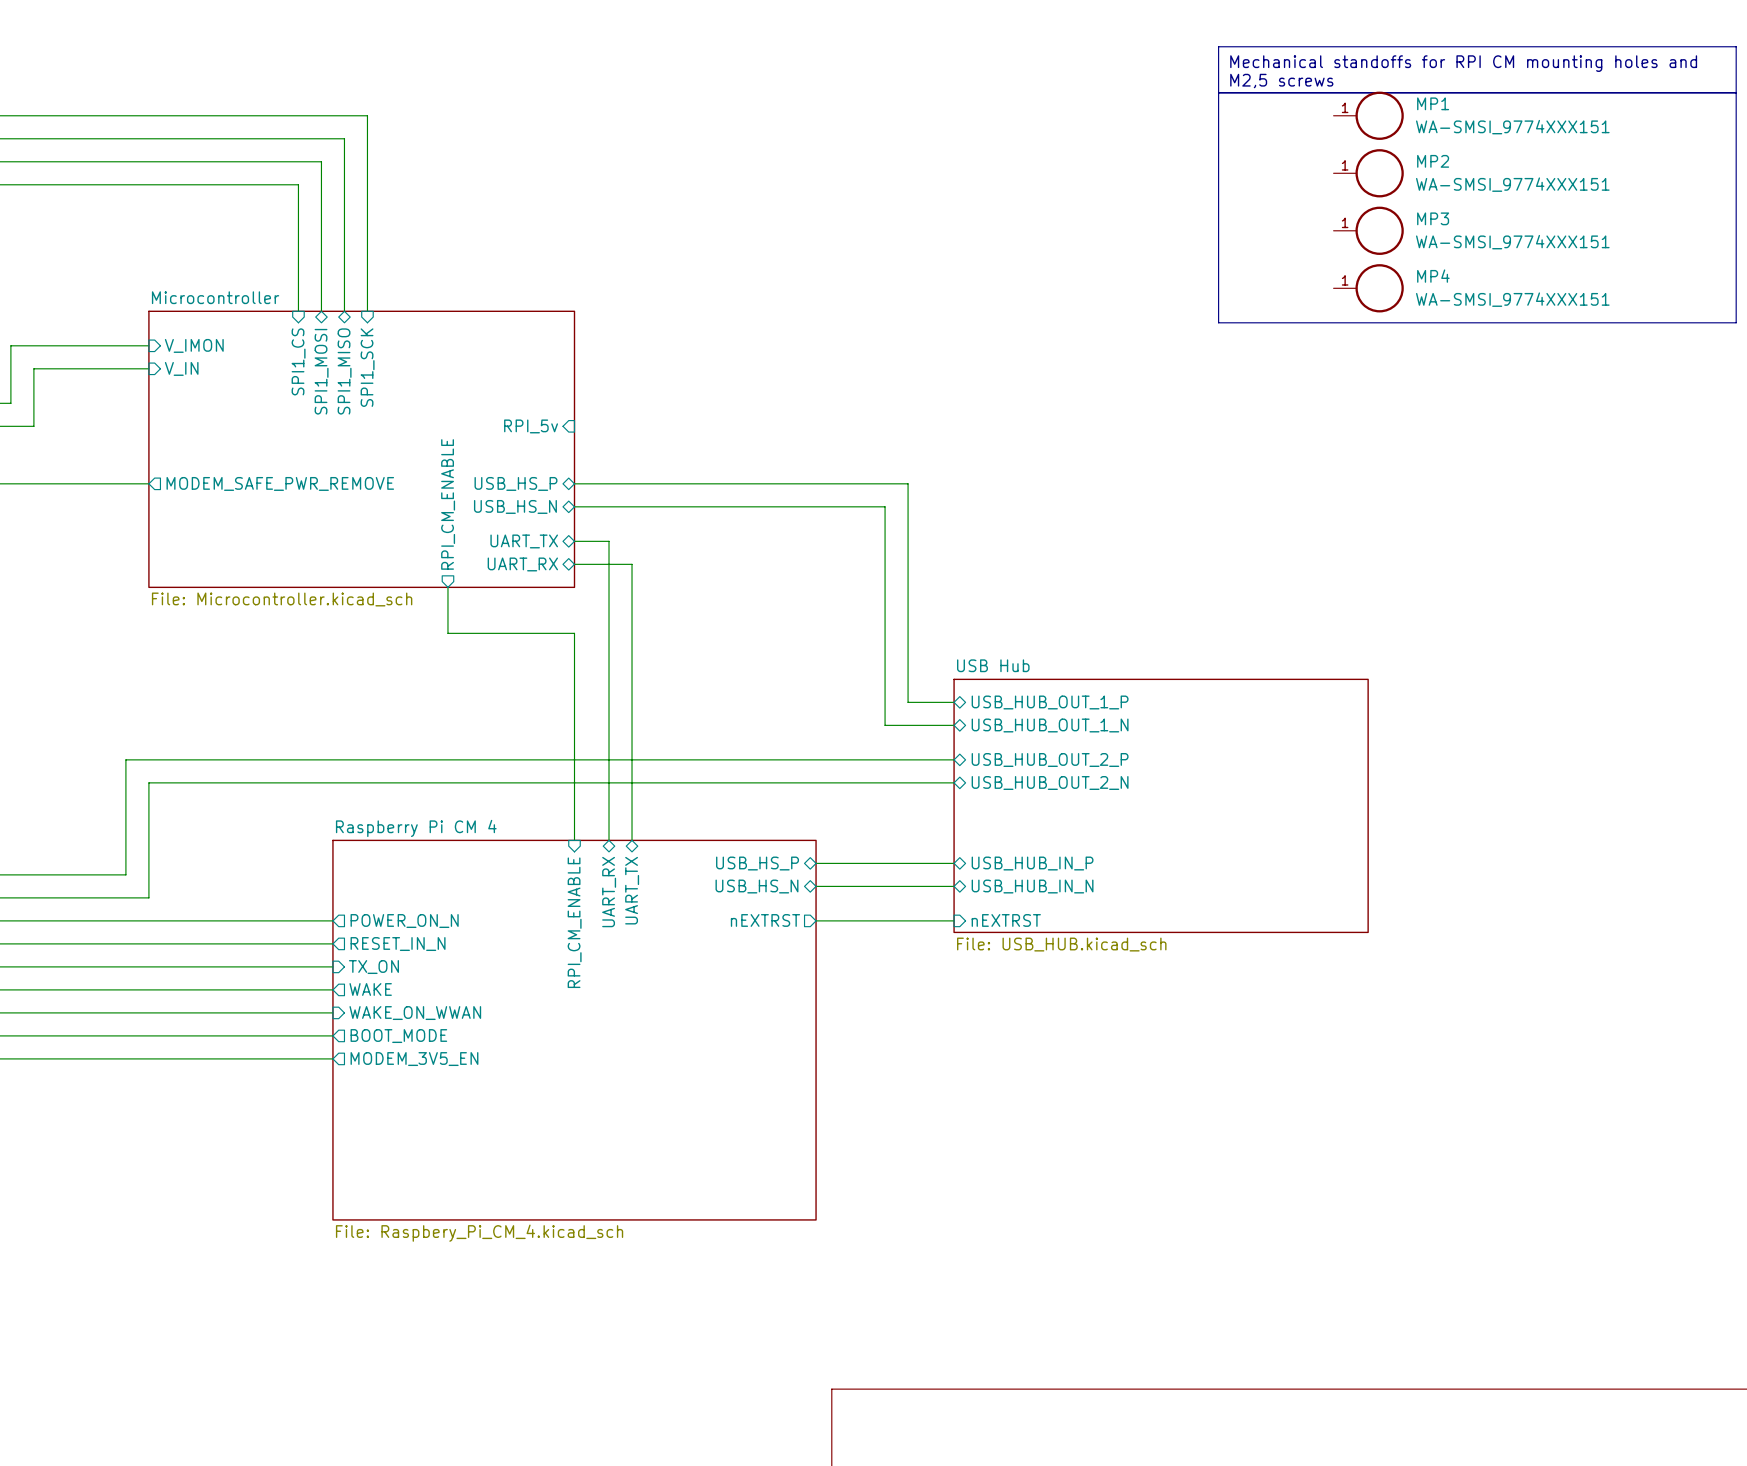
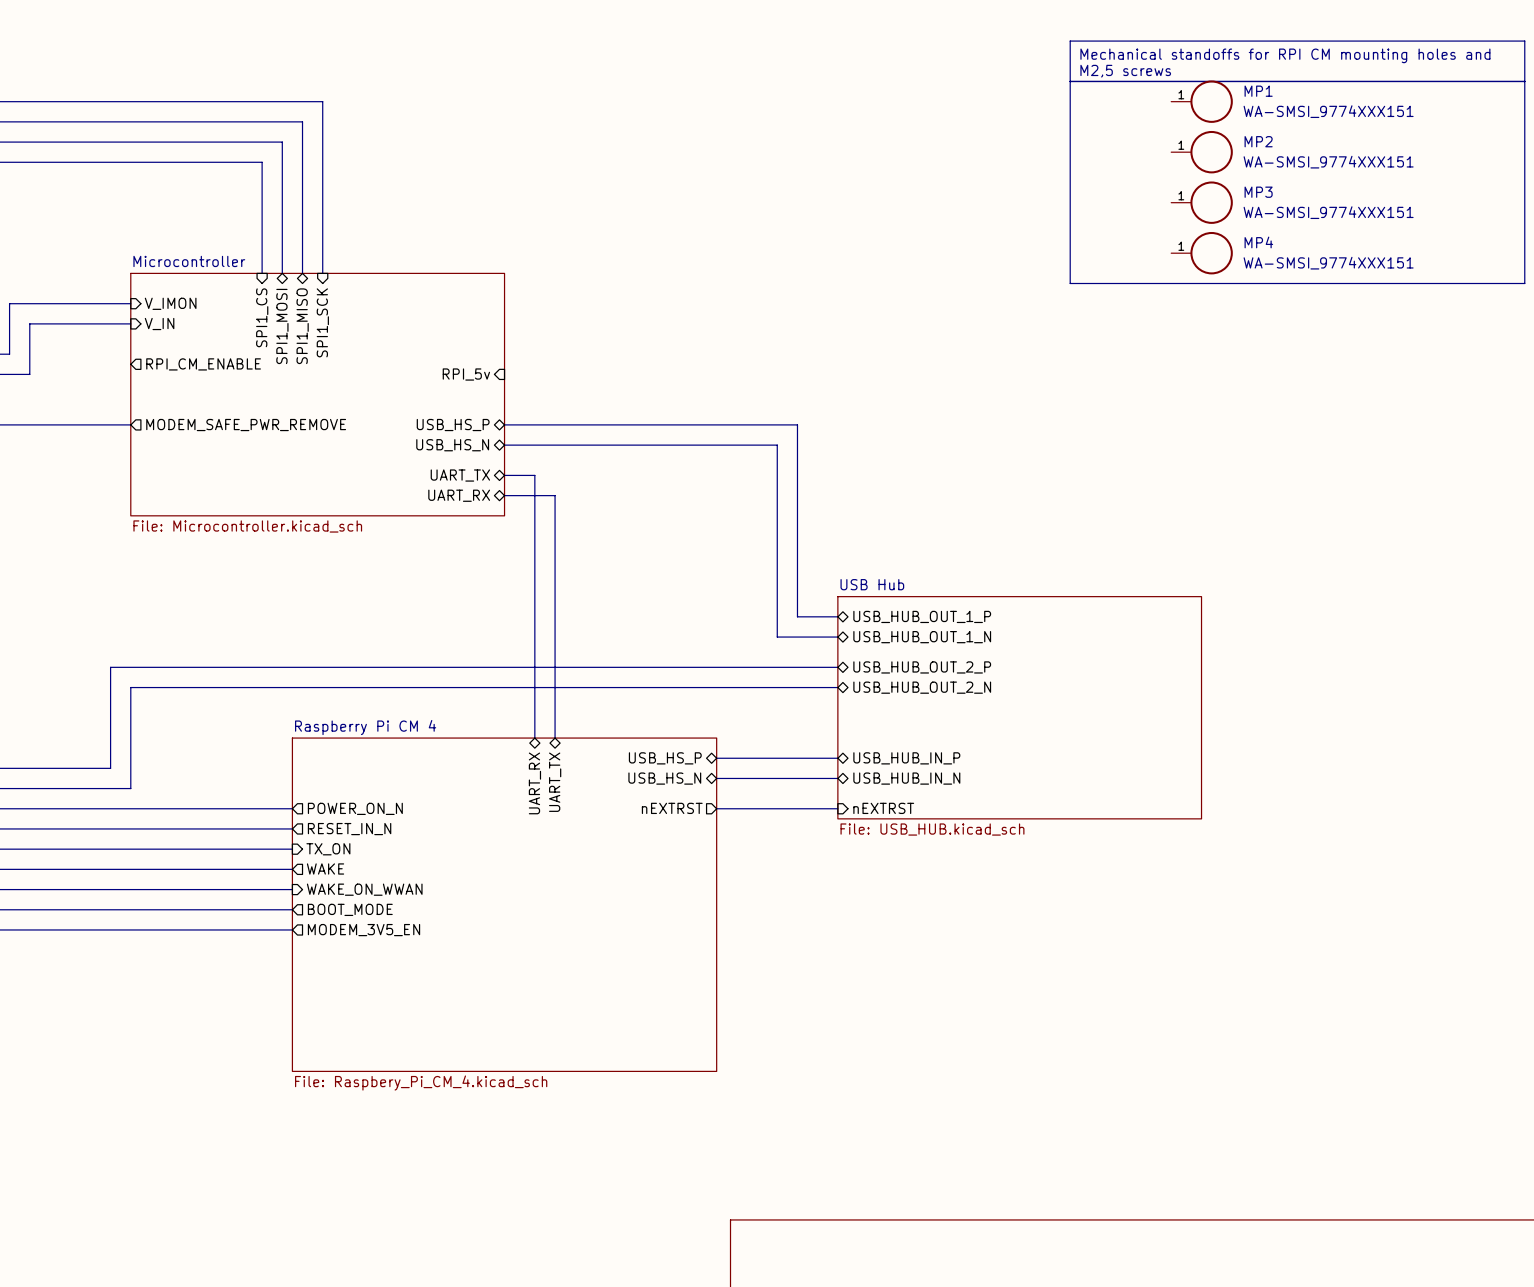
sheet pin: none -> RPI_CM_ENABLE (203, 364)
sheet pin: RPI_CM_ENABLE (448, 504) -> none
wire: (447, 587) (447, 633) (574, 633) (574, 840) -> none
sheet pin: RPI_CM_ENABLE (574, 922) -> none

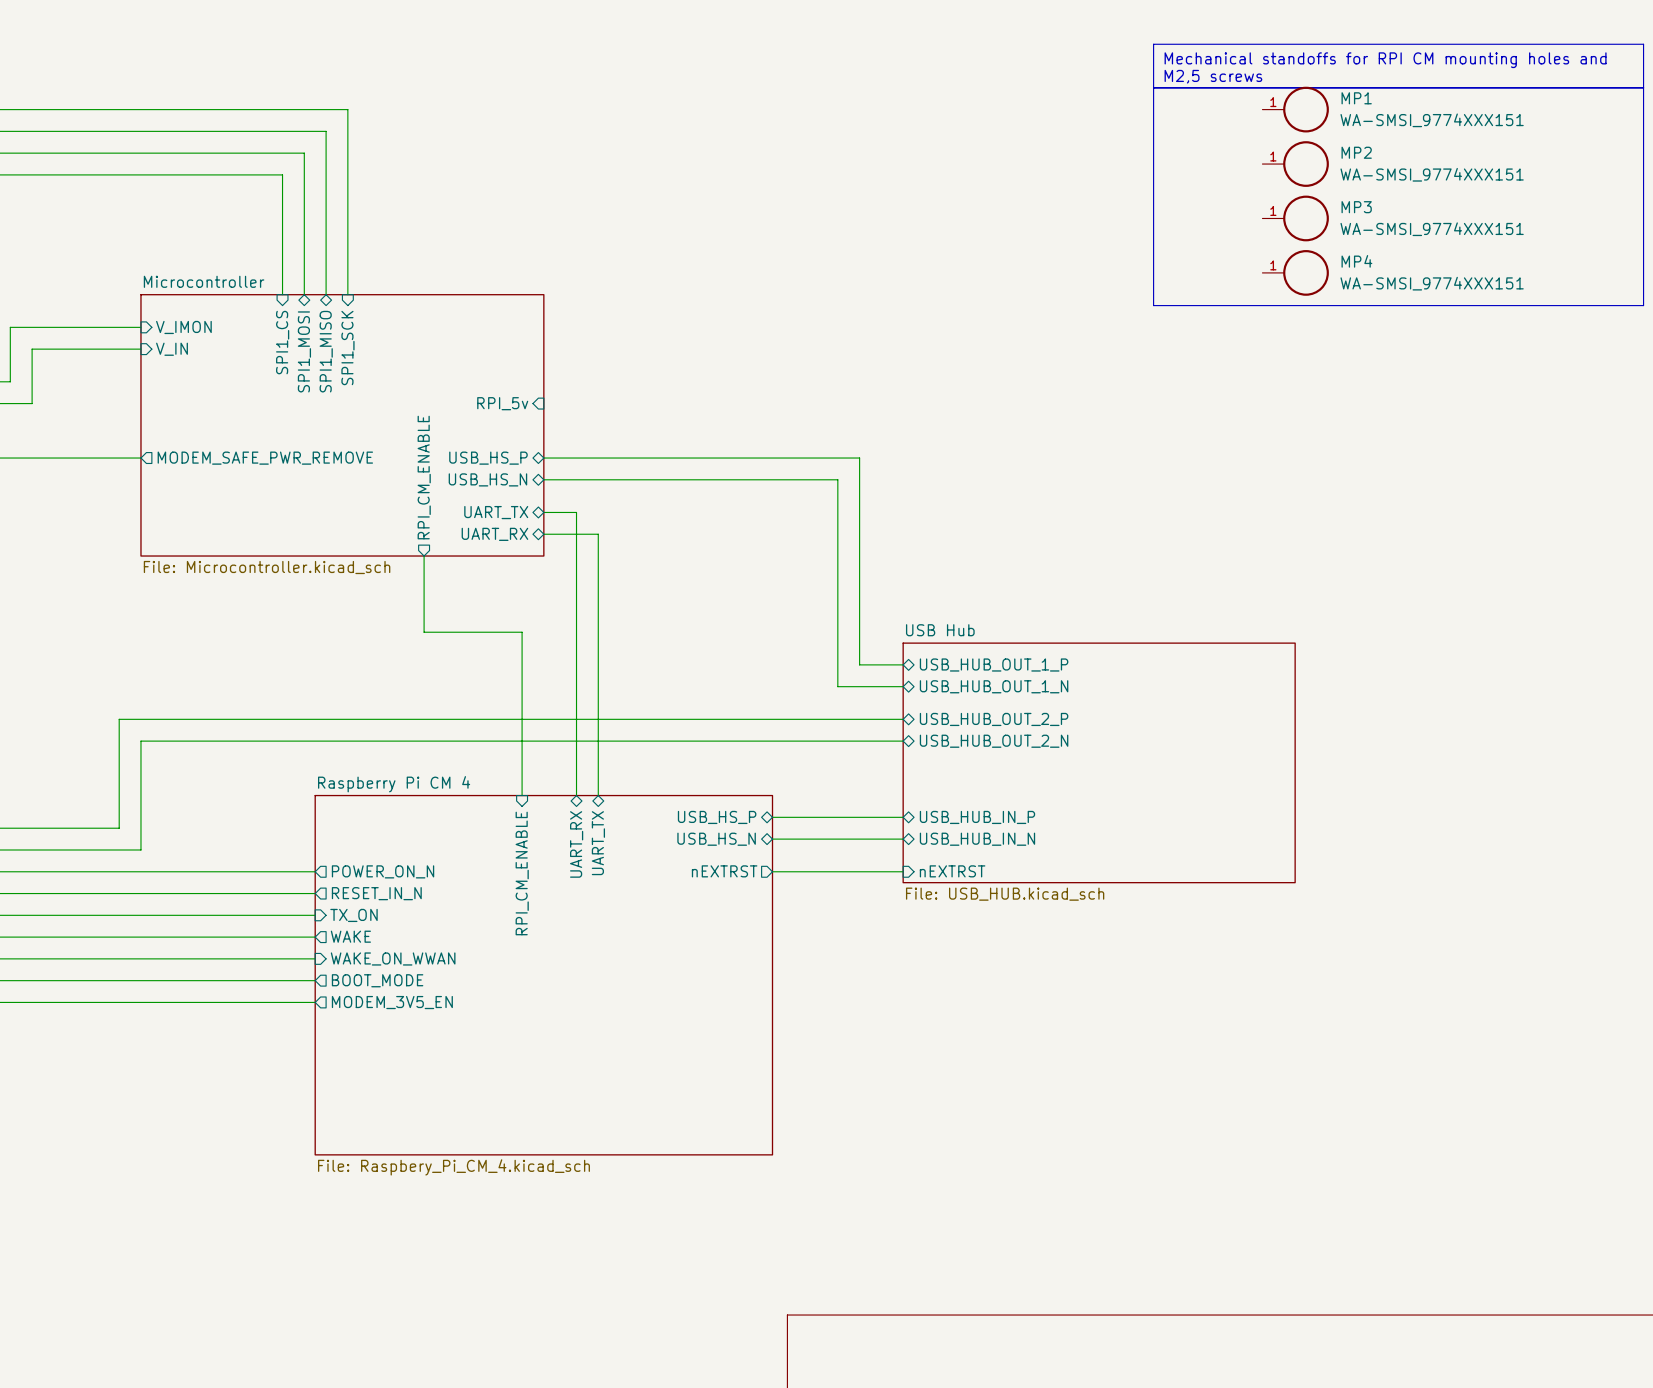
sheet pin: RPI_CM_ENABLE (203, 364) -> none
sheet pin: none -> RPI_CM_ENABLE (424, 477)
wire: none -> (424, 556) (424, 632) (522, 632) (522, 795)
sheet pin: none -> RPI_CM_ENABLE (522, 873)

